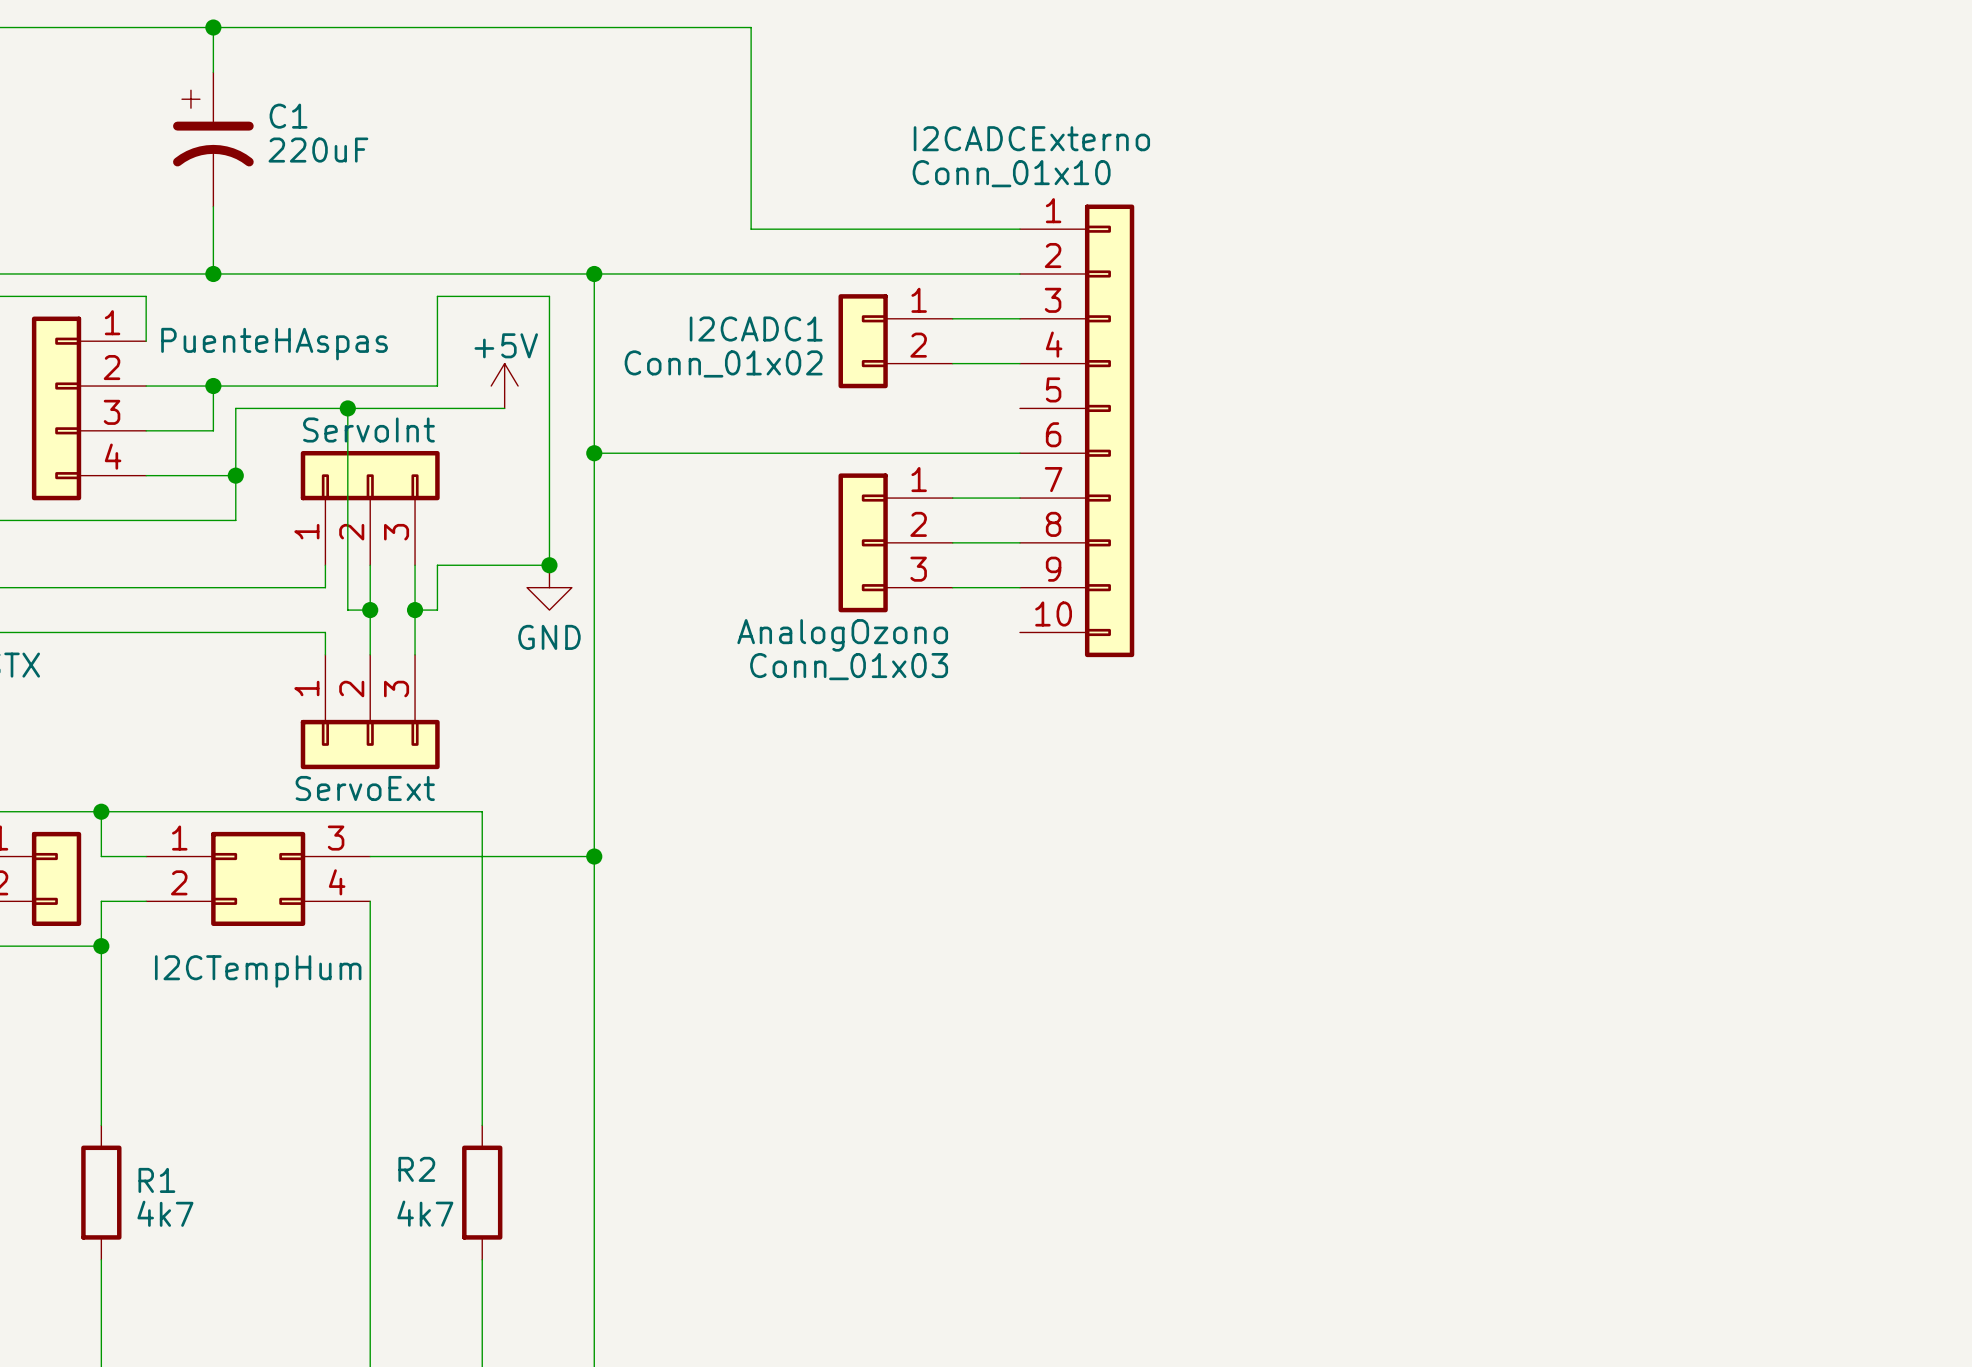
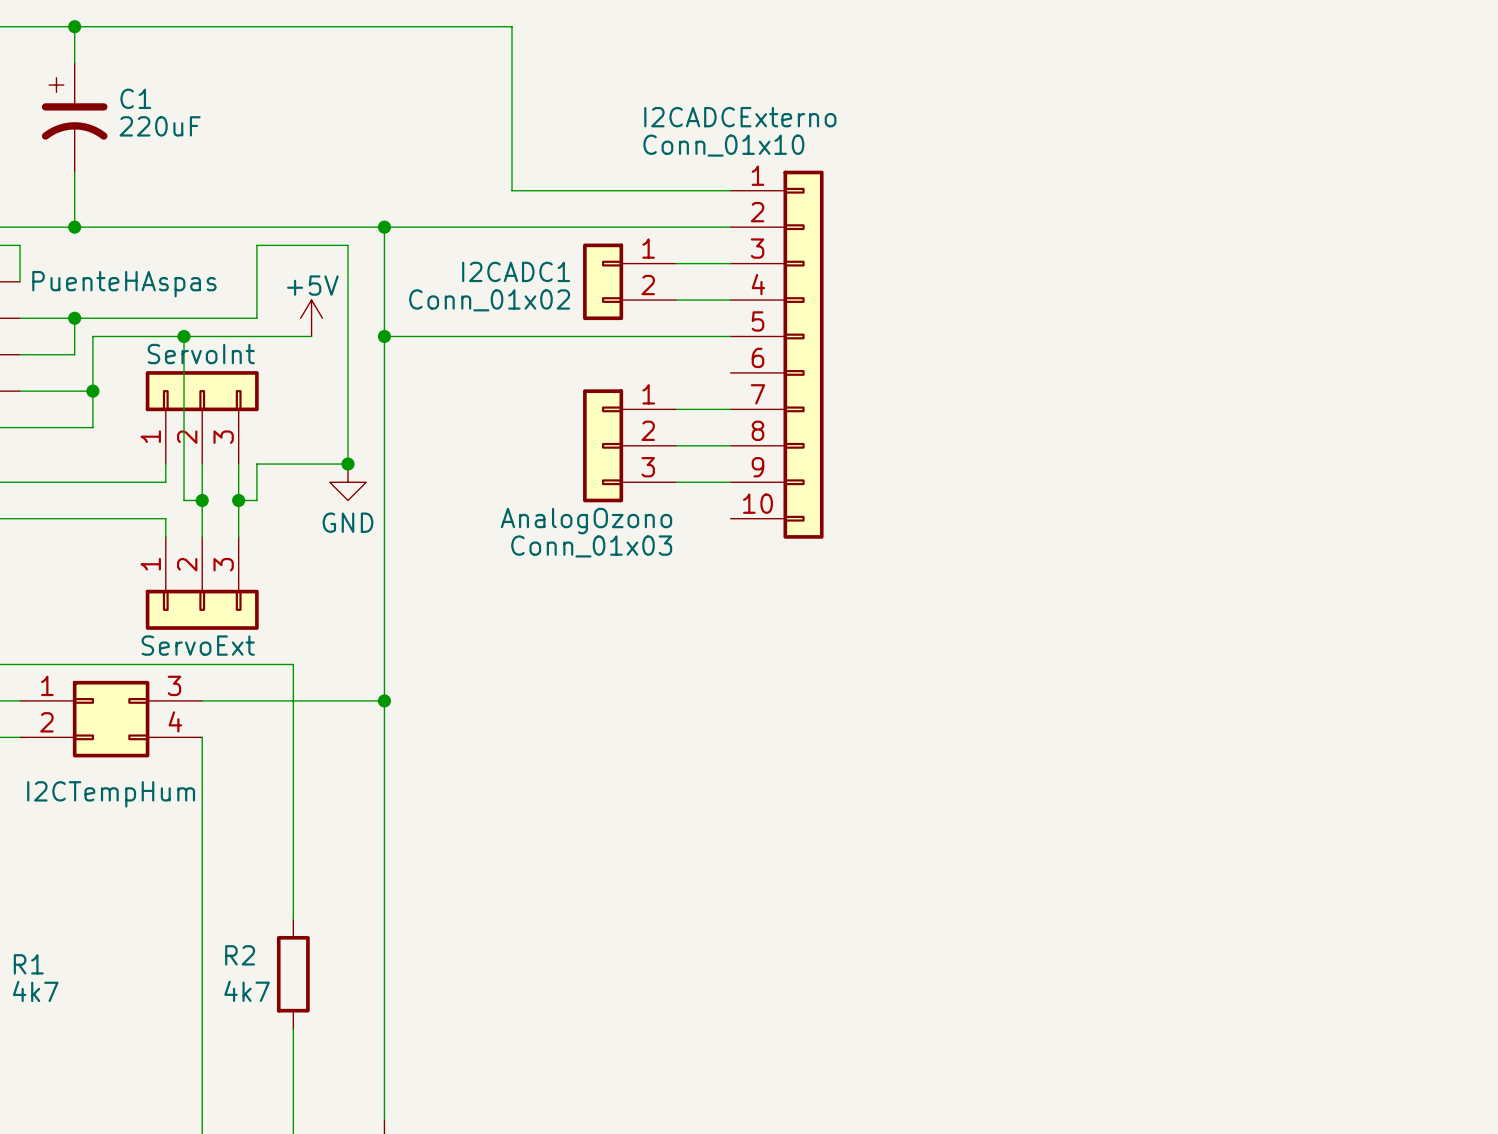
wire: (594, 453) (1019, 453) -> (384, 336) (730, 336)
junction position: (594, 453) -> (384, 336)

